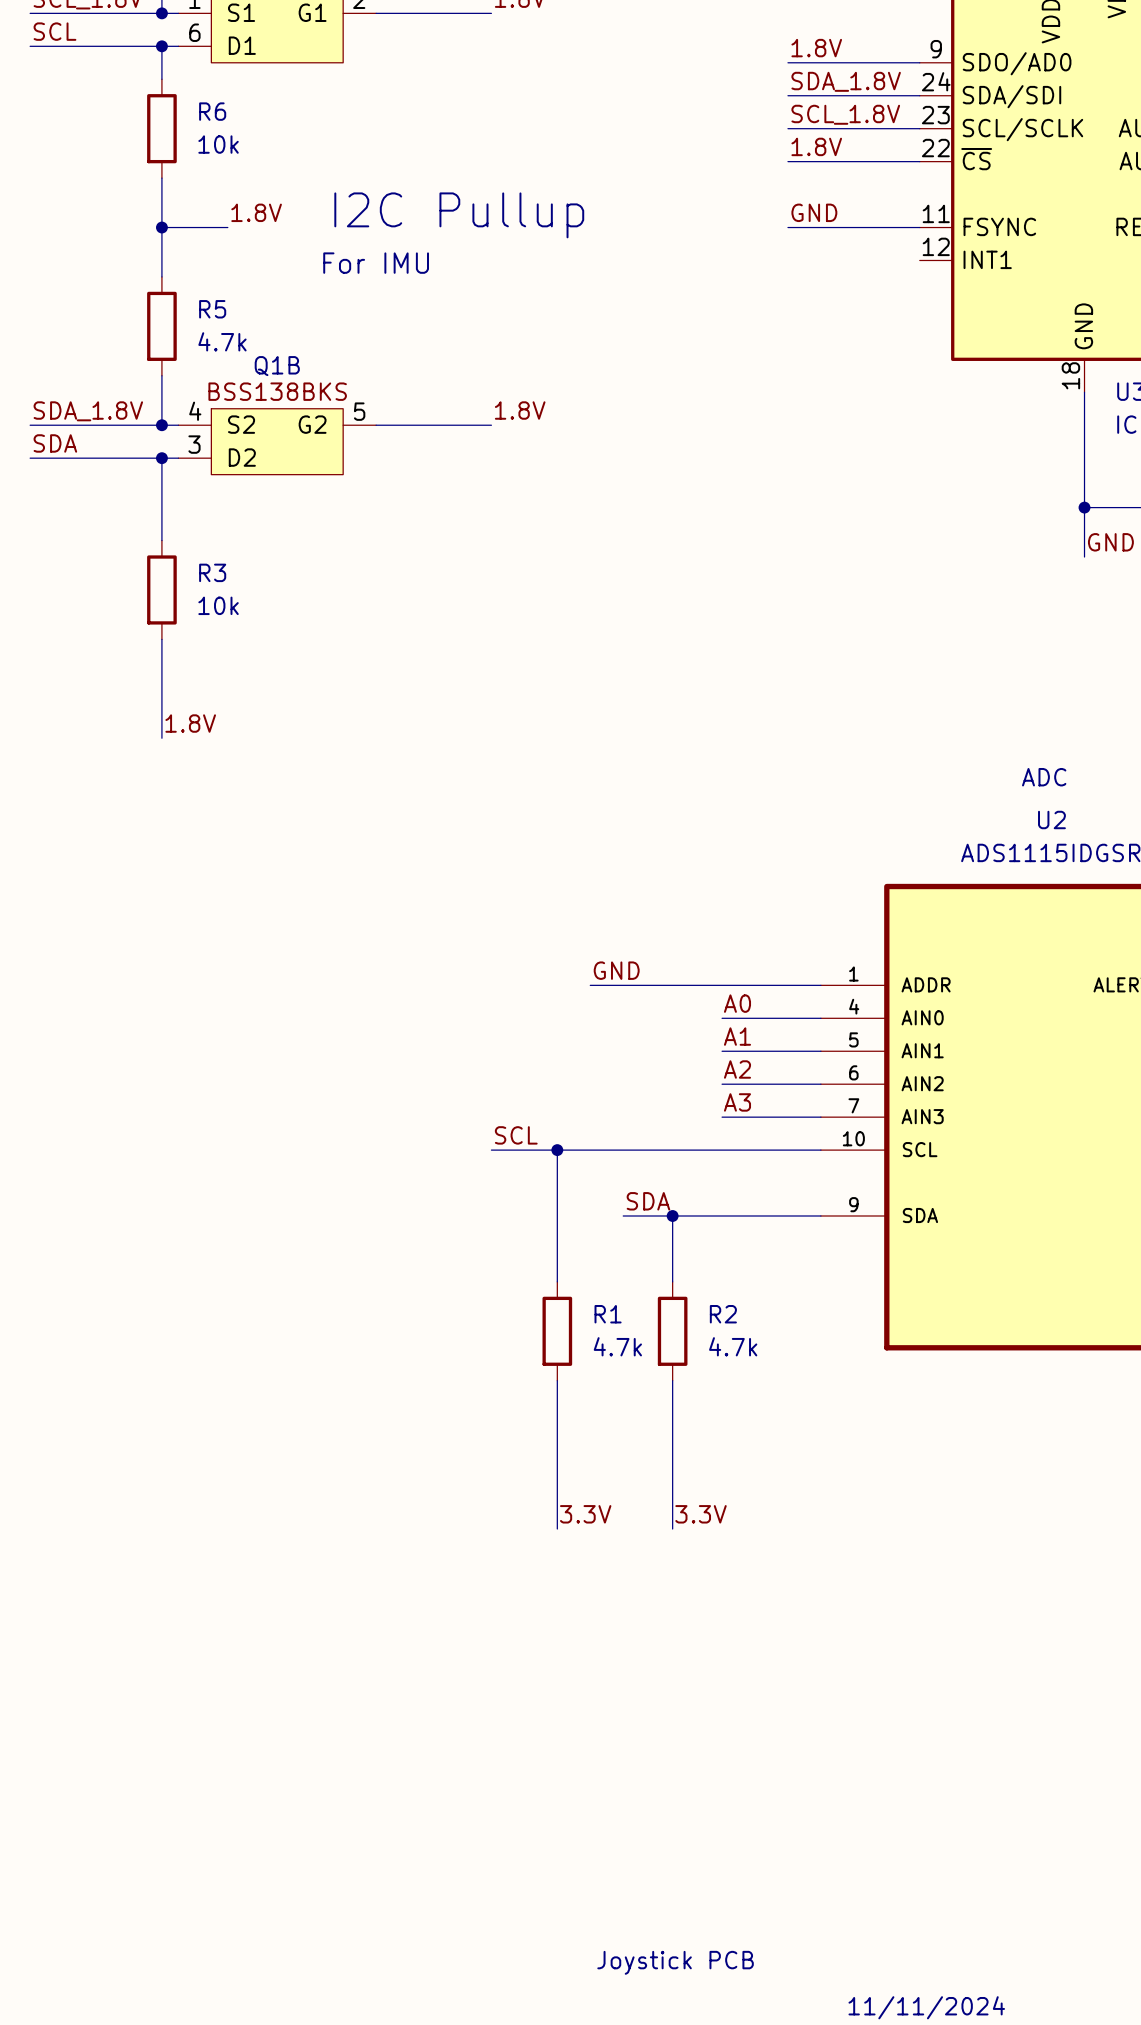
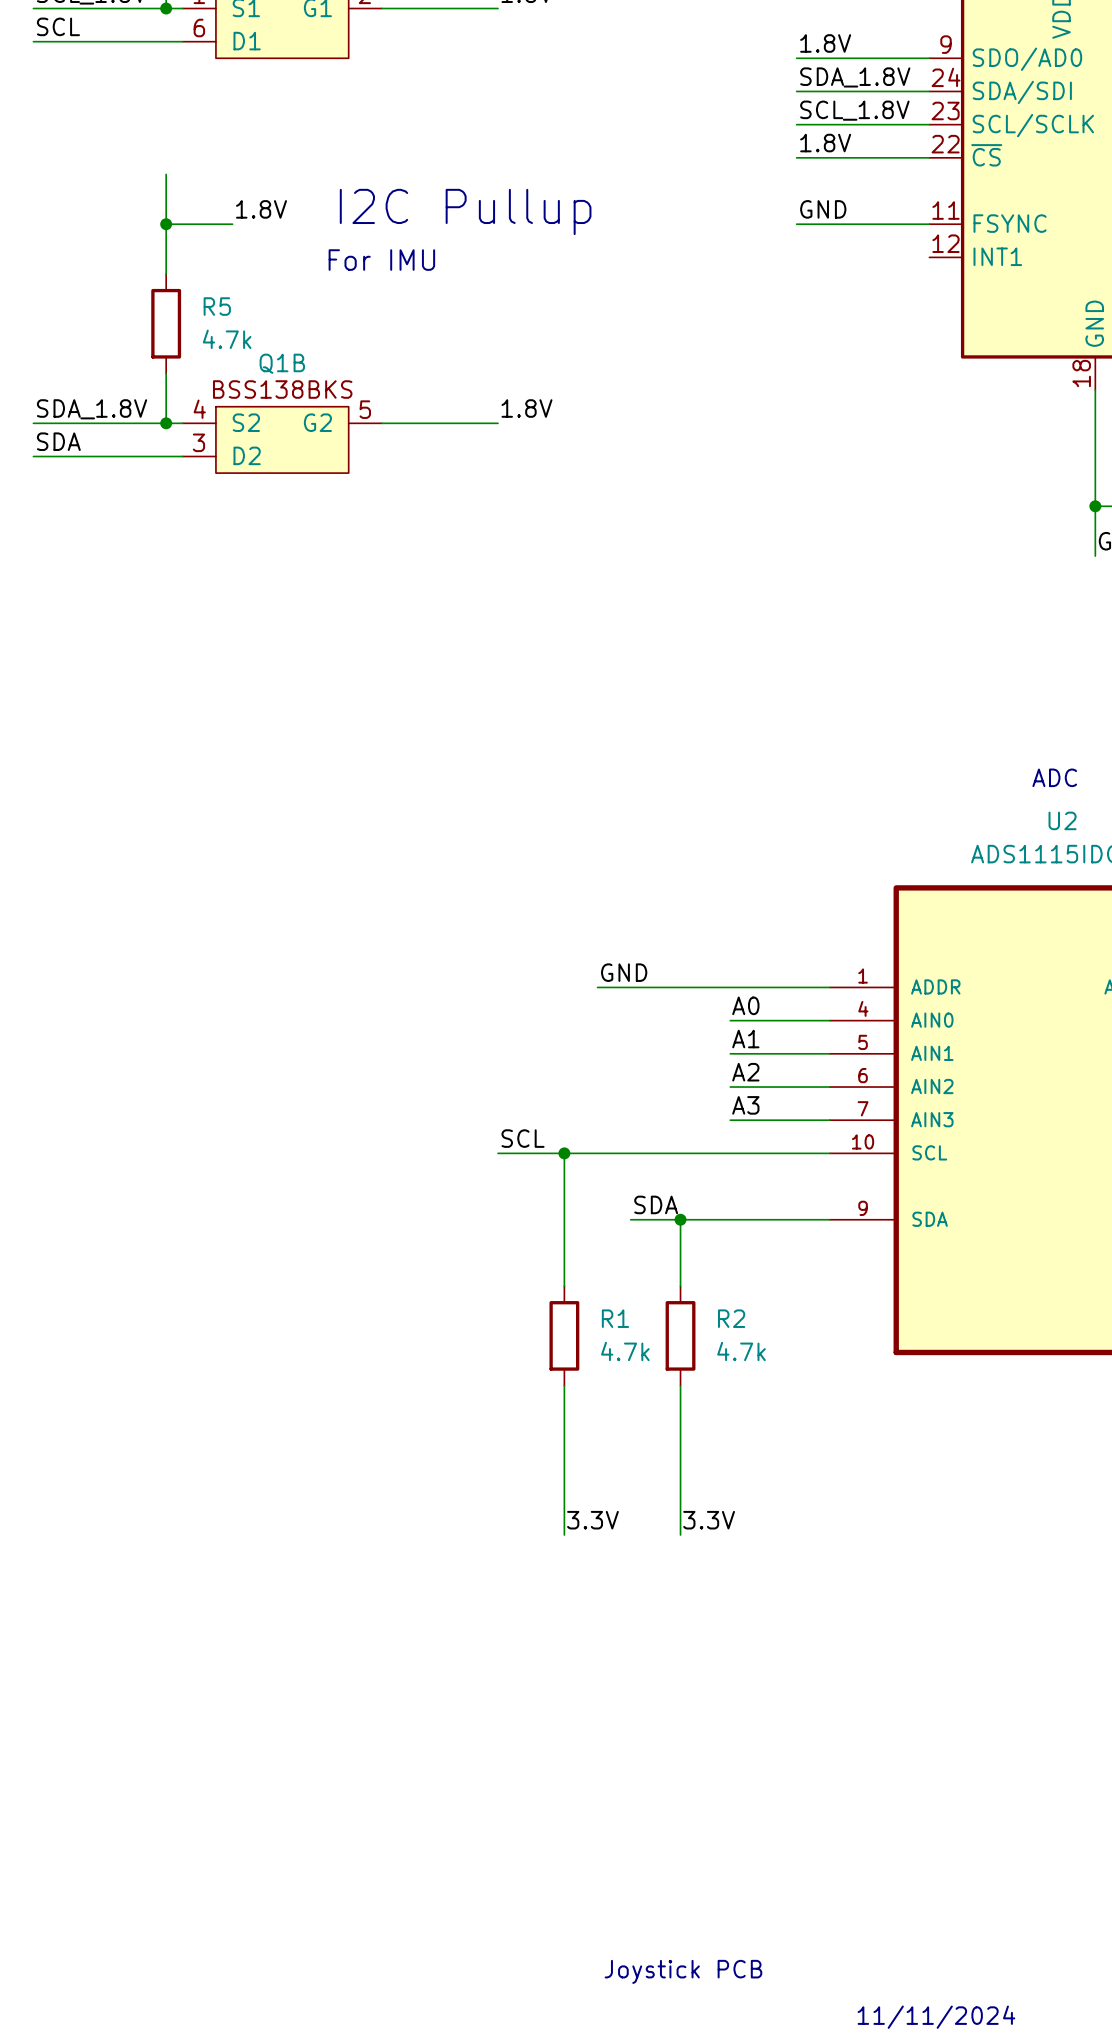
wire: (161, 46) (161, 79) -> none
junction: (161, 46) -> none
R6: 10k (161, 128) -> none
wire: (161, 458) (161, 540) -> none
junction: (161, 458) -> none
R3: 10k (161, 589) -> none
wire: (161, 639) (161, 738) -> none
label: 1.8V (190, 723) -> none

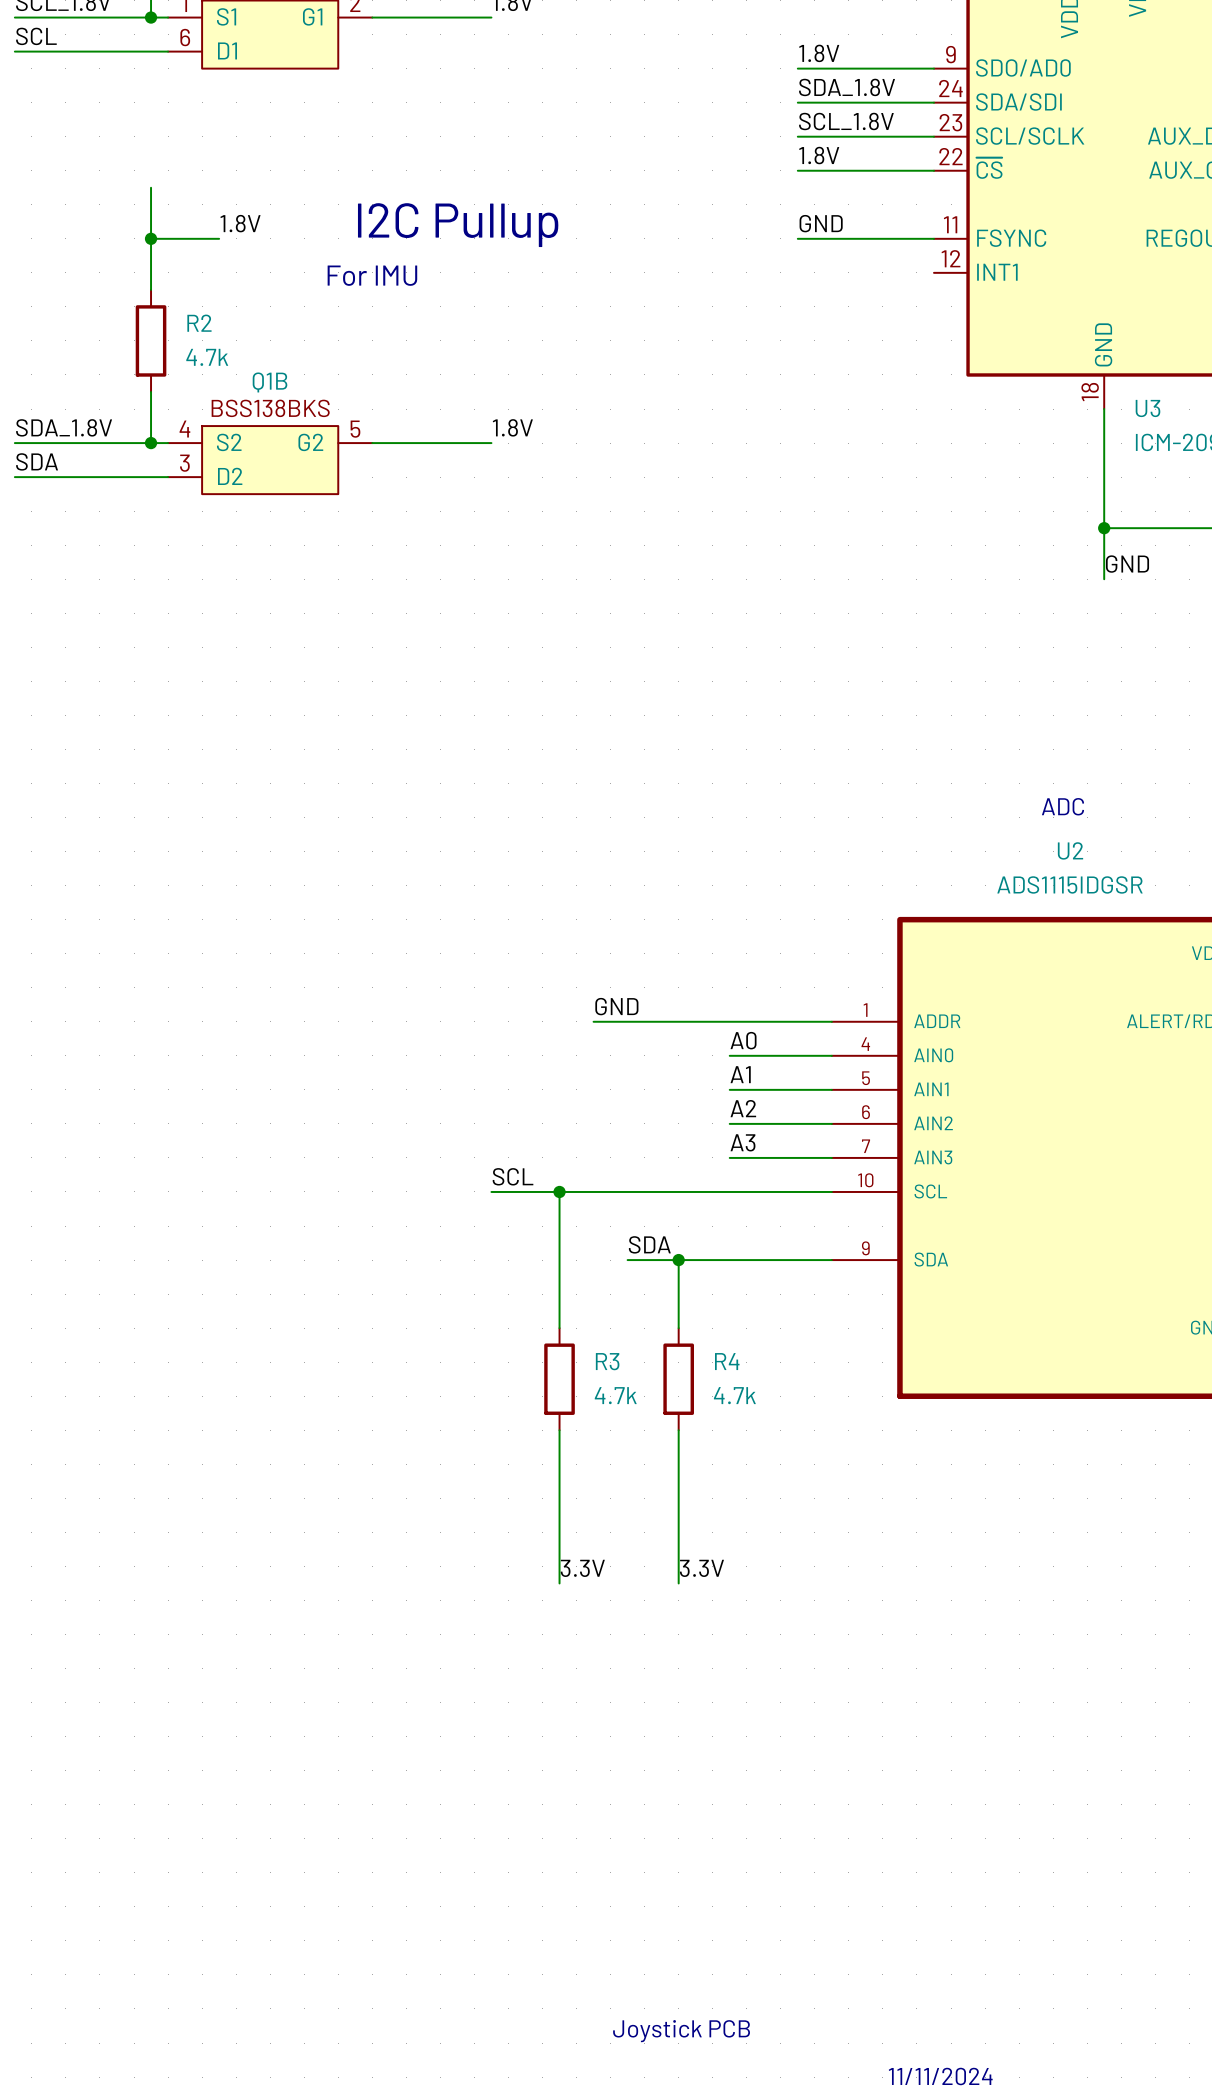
R5 name: R5 (217, 306) -> R2 (199, 323)
R1 name: R1 (615, 1318) -> R3 (607, 1361)
R2 name: R2 (731, 1318) -> R4 (727, 1361)

